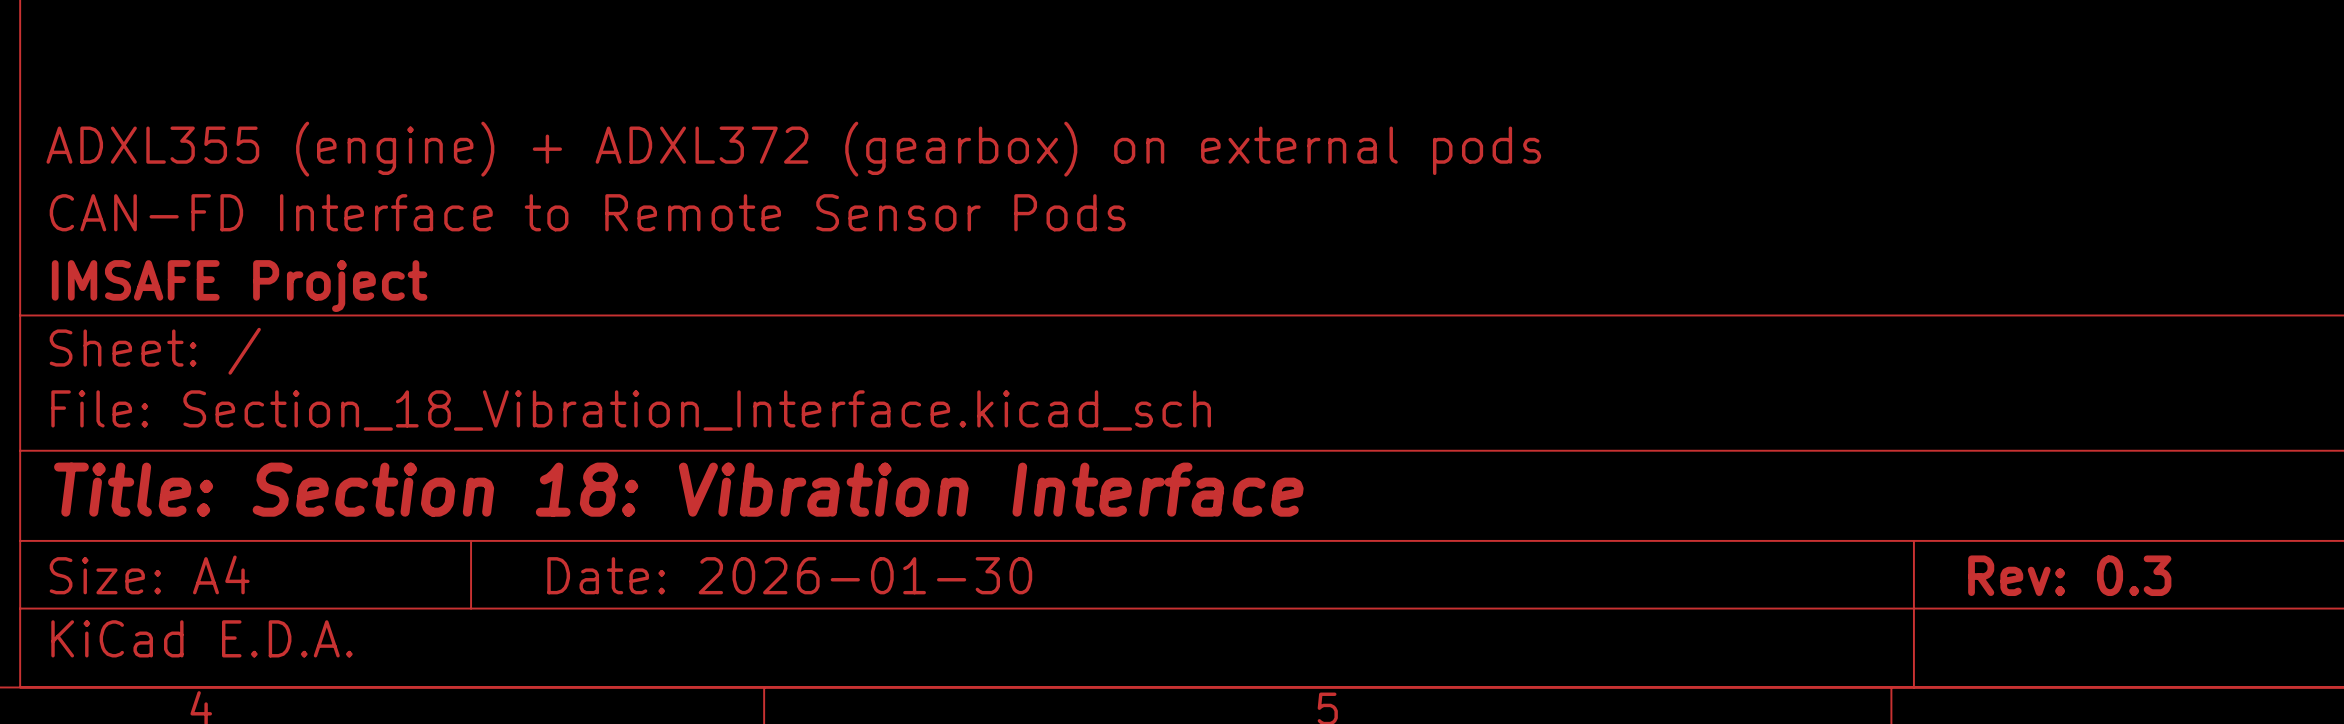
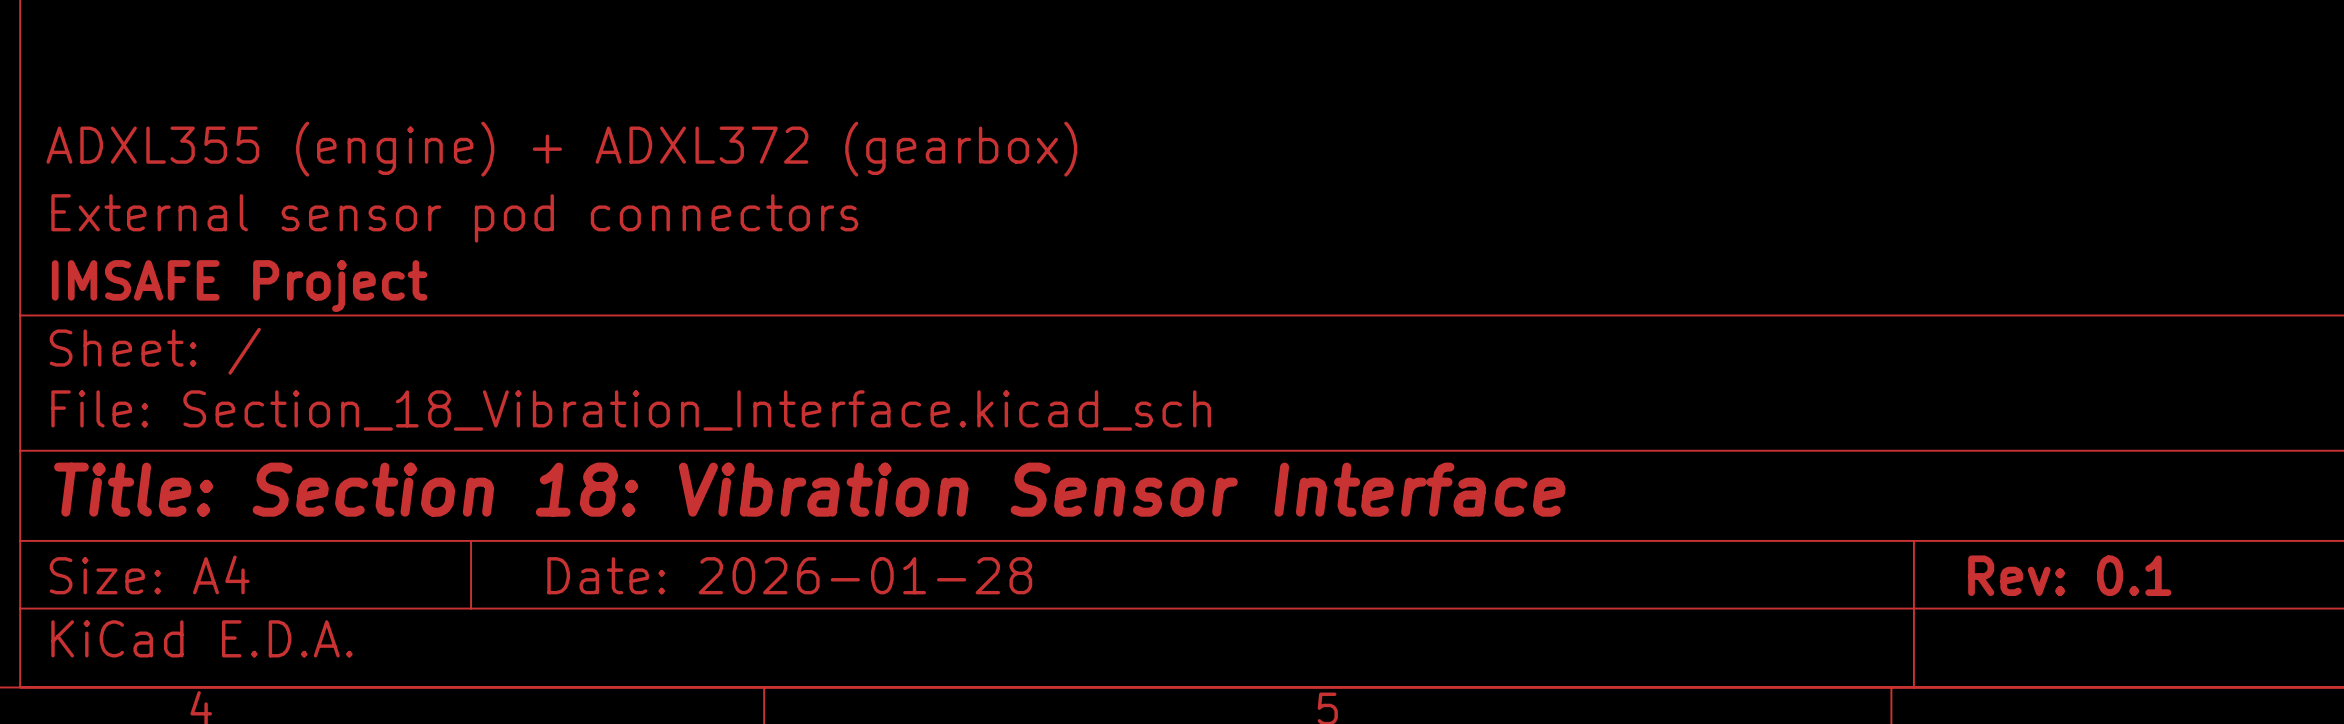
title block: ADXL355 (engine) + ADXL372 (gearbox) on external pods (793, 149) -> ADXL355 (engine) + ADXL372 (gearbox) (561, 149)
title block: CAN-FD Interface to Remote Sensor Pods (587, 212) -> External sensor pod connectors (454, 218)
title block: Title: Section 18: Vibration Interface (678, 489) -> Title: Section 18: Vibration Sensor Interface (809, 489)
title block: Date: 2026-01-30 (789, 575) -> Date: 2026-01-28 (789, 575)
title block: Rev: 0.3 (2069, 575) -> Rev: 0.1 (2069, 575)

